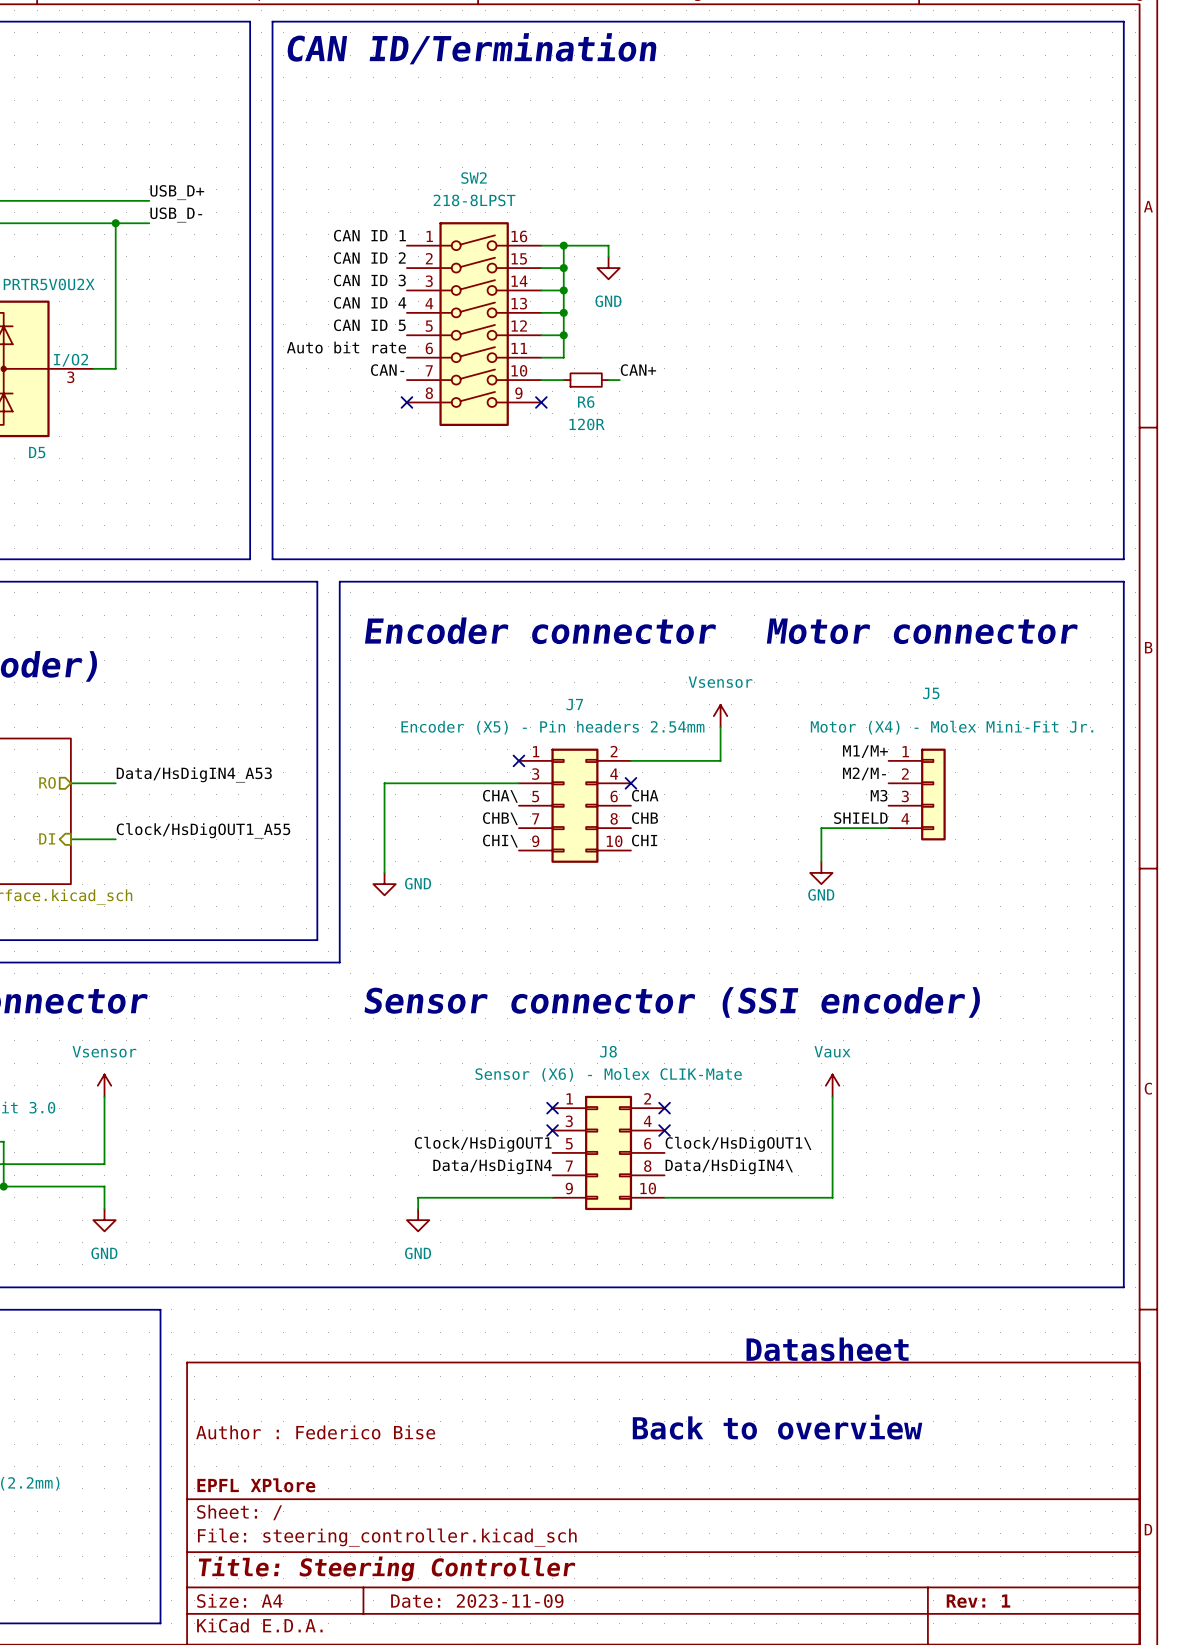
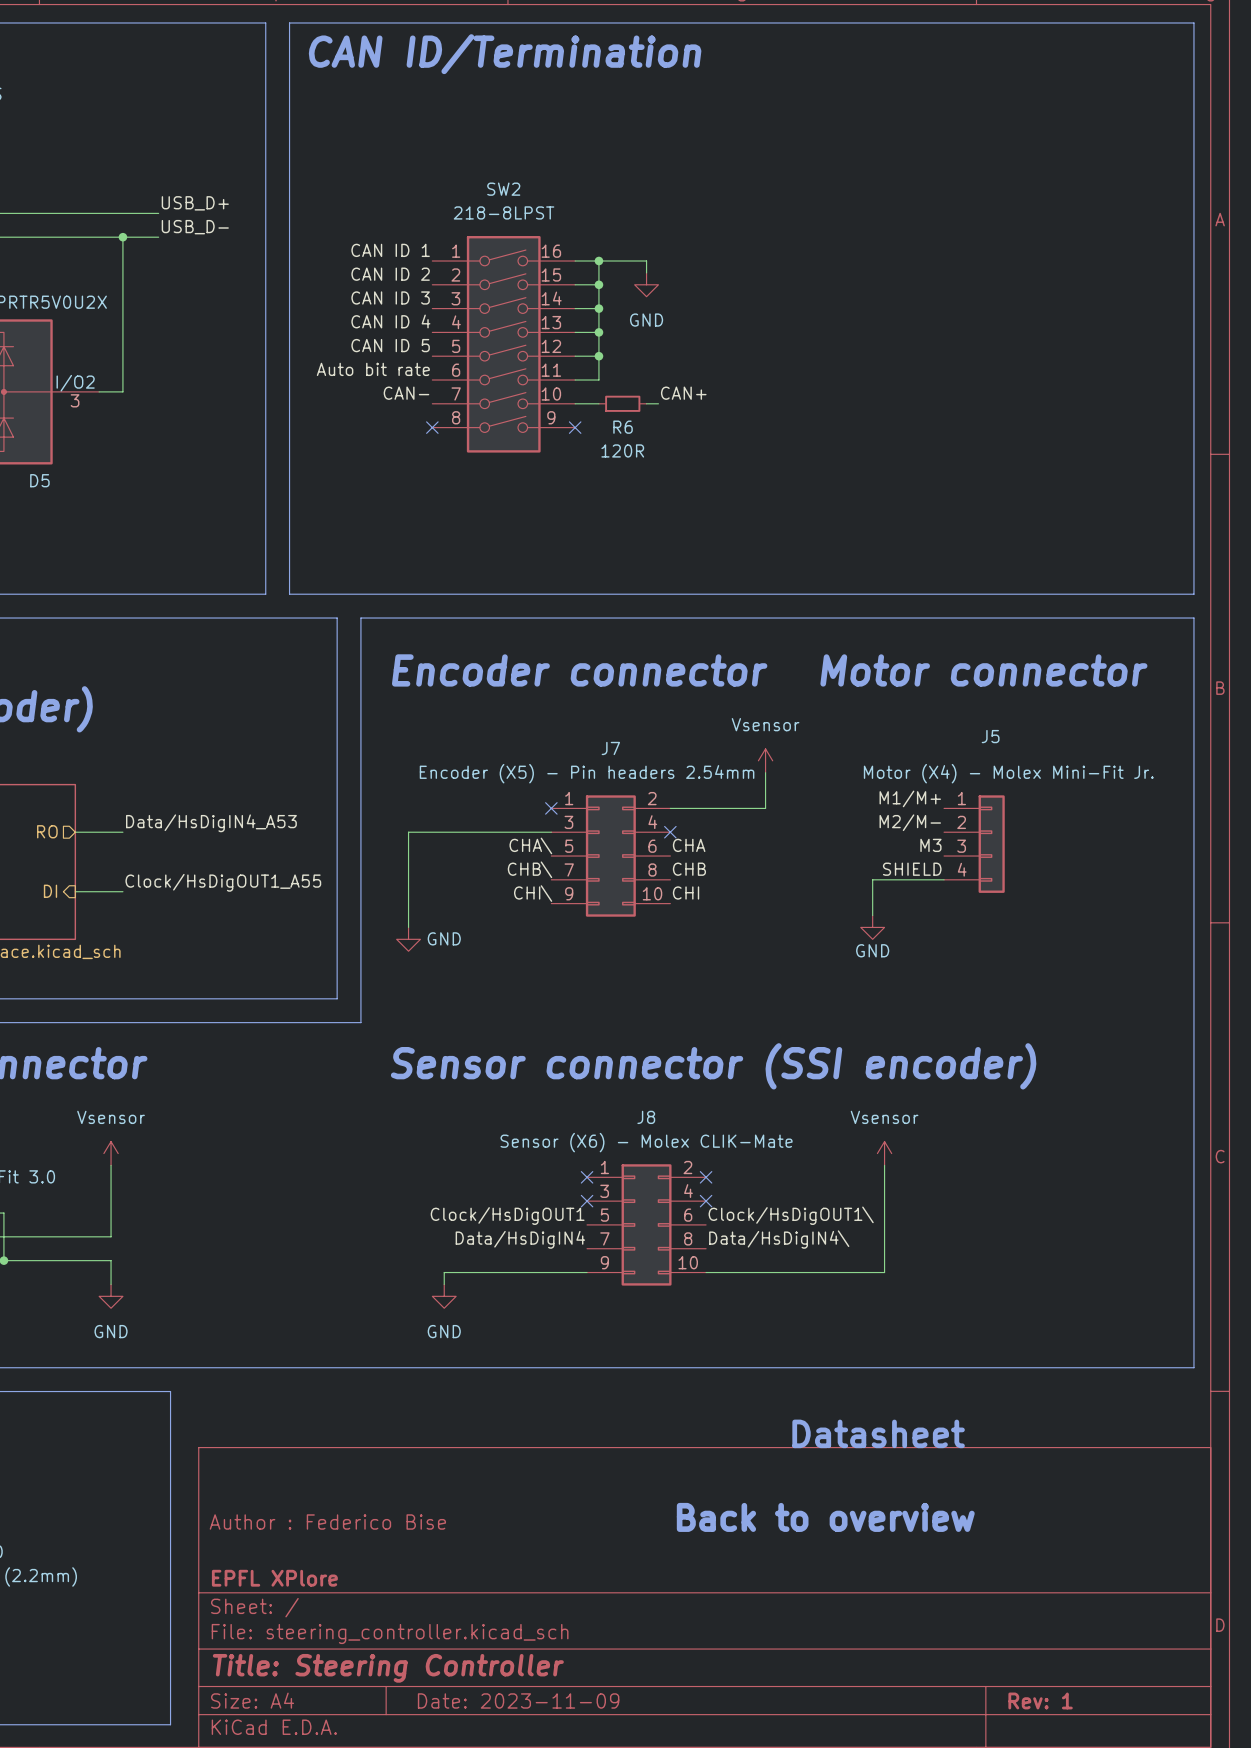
power symbol: Vaux (832, 1085) -> Vsensor (884, 1153)

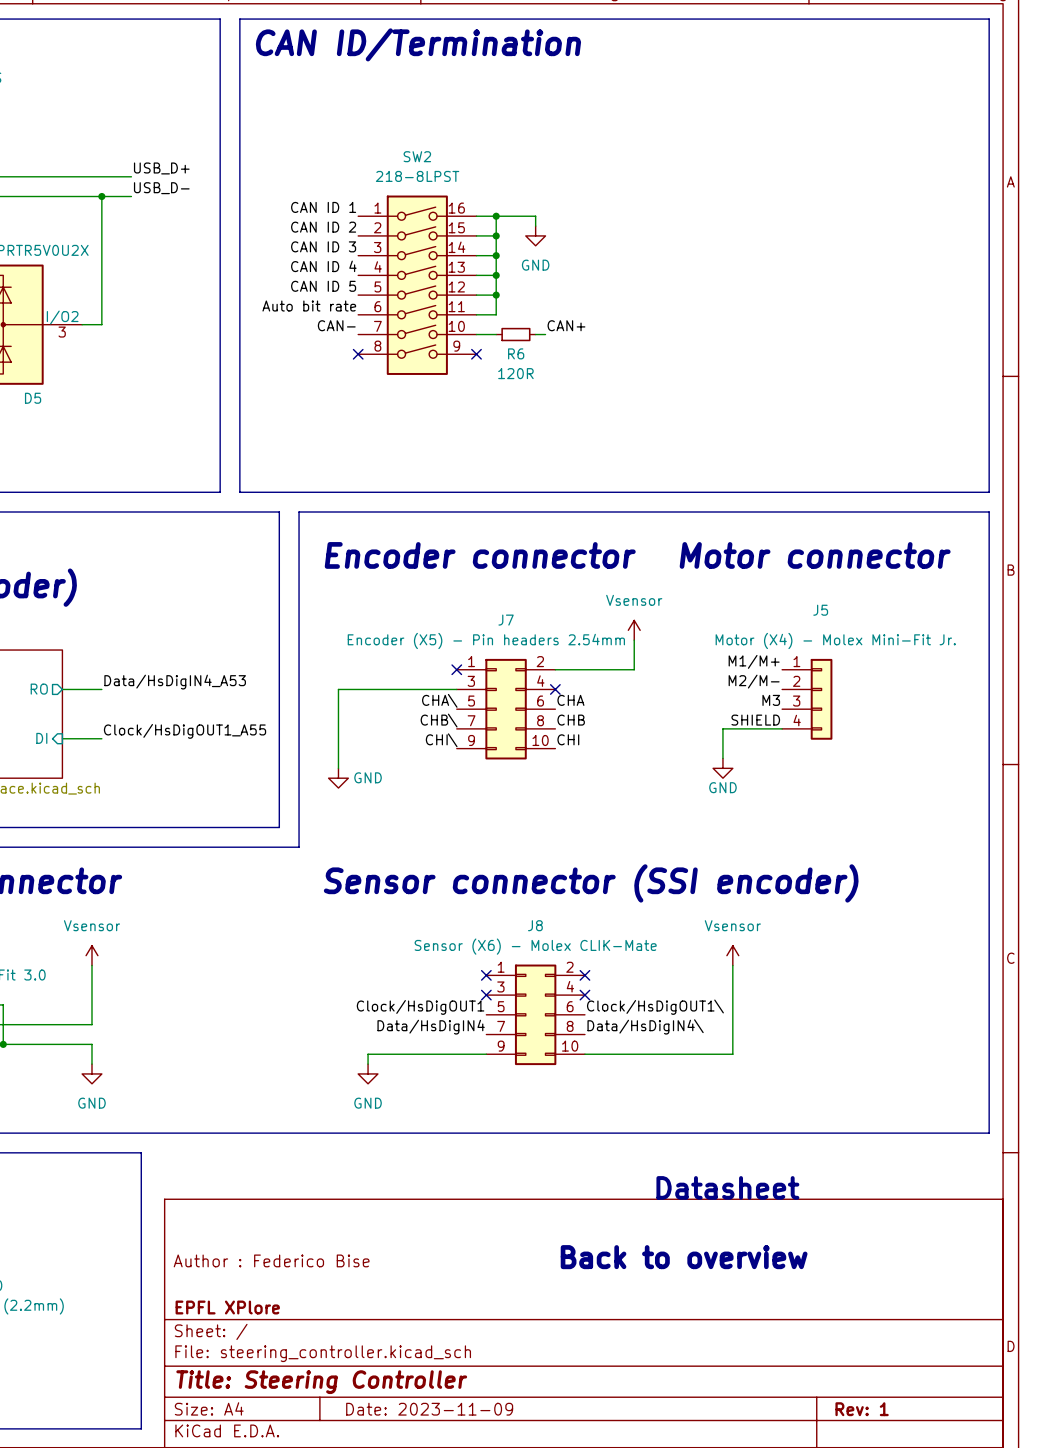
hierarchical label: RO (47, 831) -> none
sheet pin: none -> RO (39, 689)
hierarchical label: DI (50, 891) -> none
sheet pin: none -> DI (41, 738)

